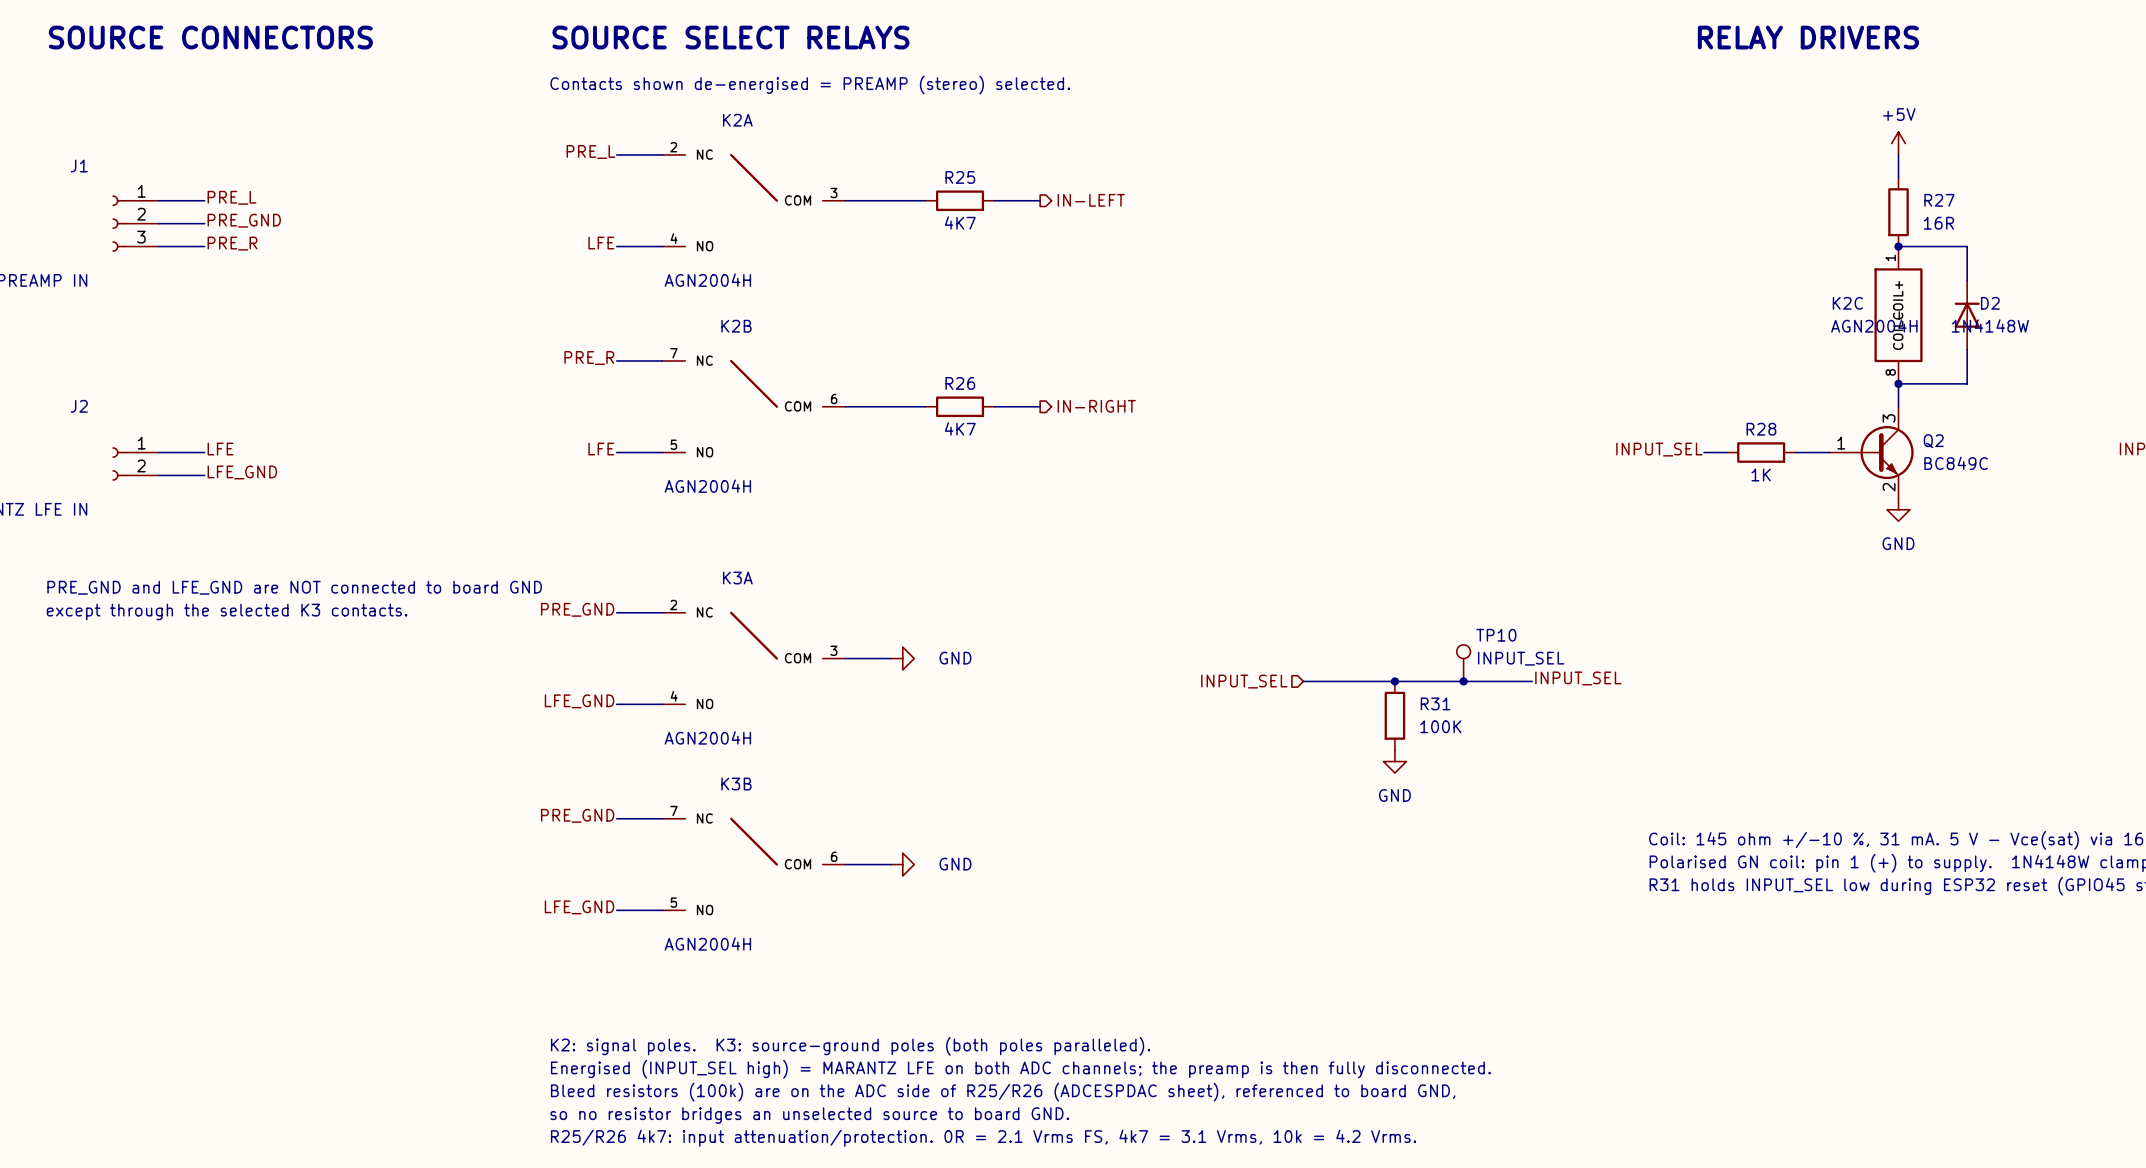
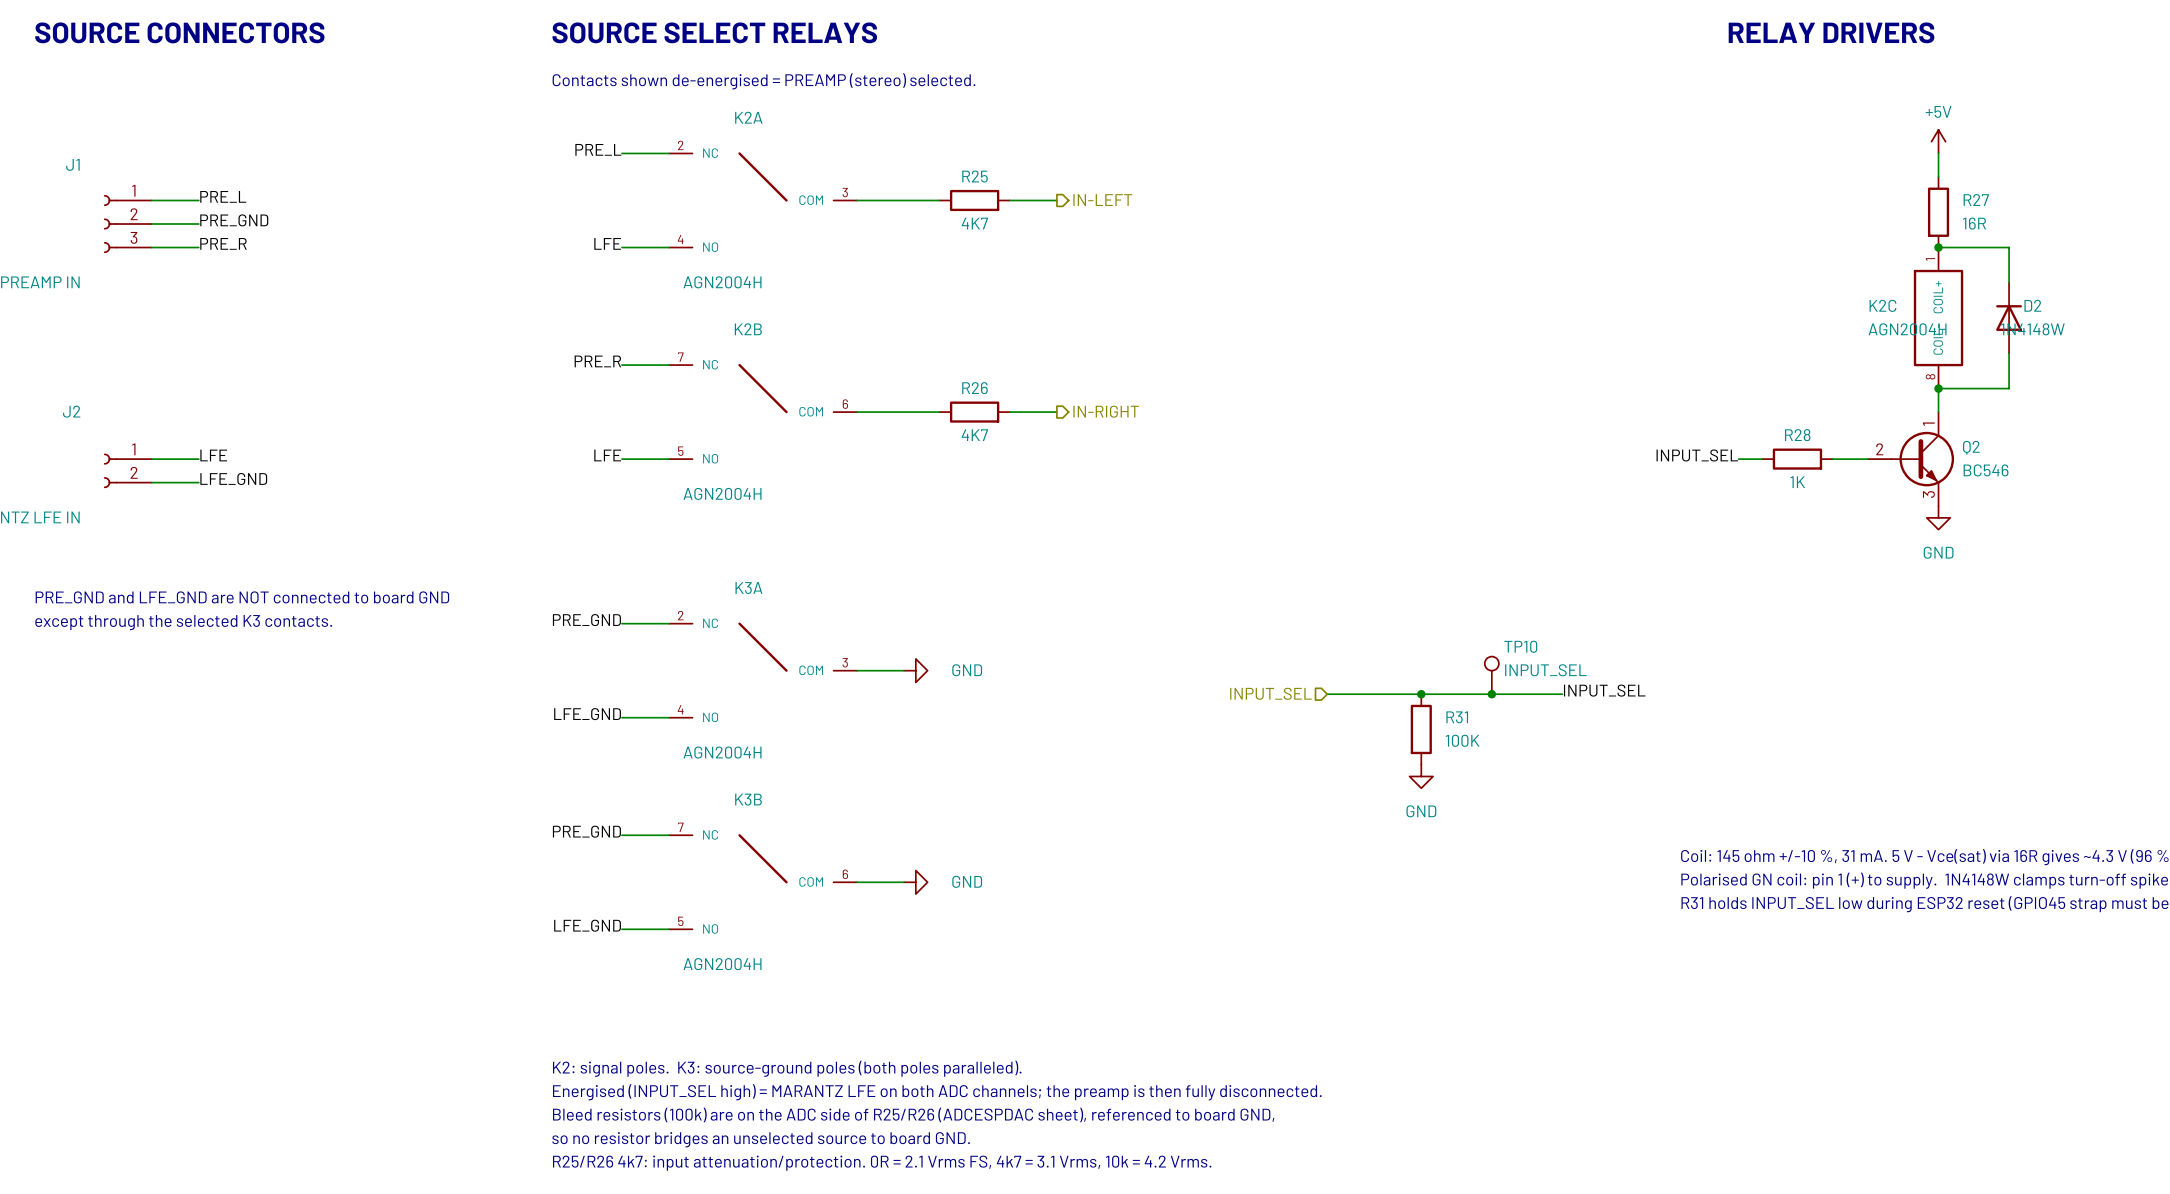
Q2 pin number: 3 (1889, 418) -> 1 (1928, 424)
Q2 pin number: 1 (1841, 443) -> 2 (1879, 449)
Q2 value: BC849C (1956, 463) -> BC546 (1986, 470)
Q2 pin number: 2 (1889, 487) -> 3 (1928, 494)

